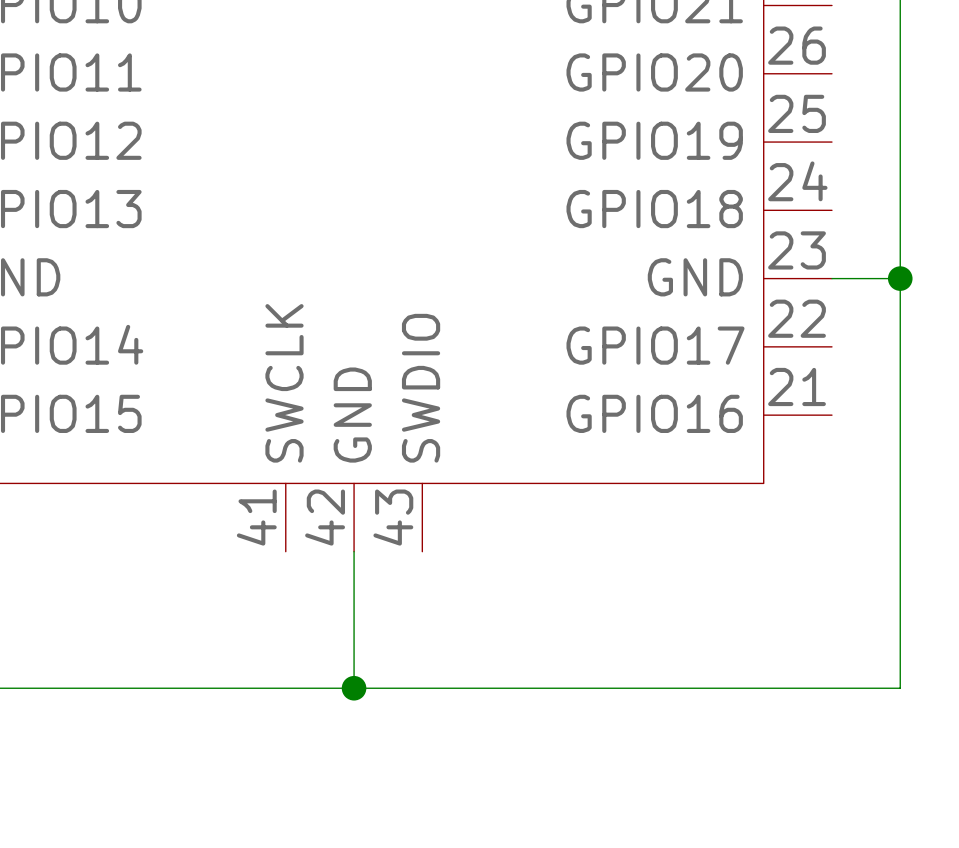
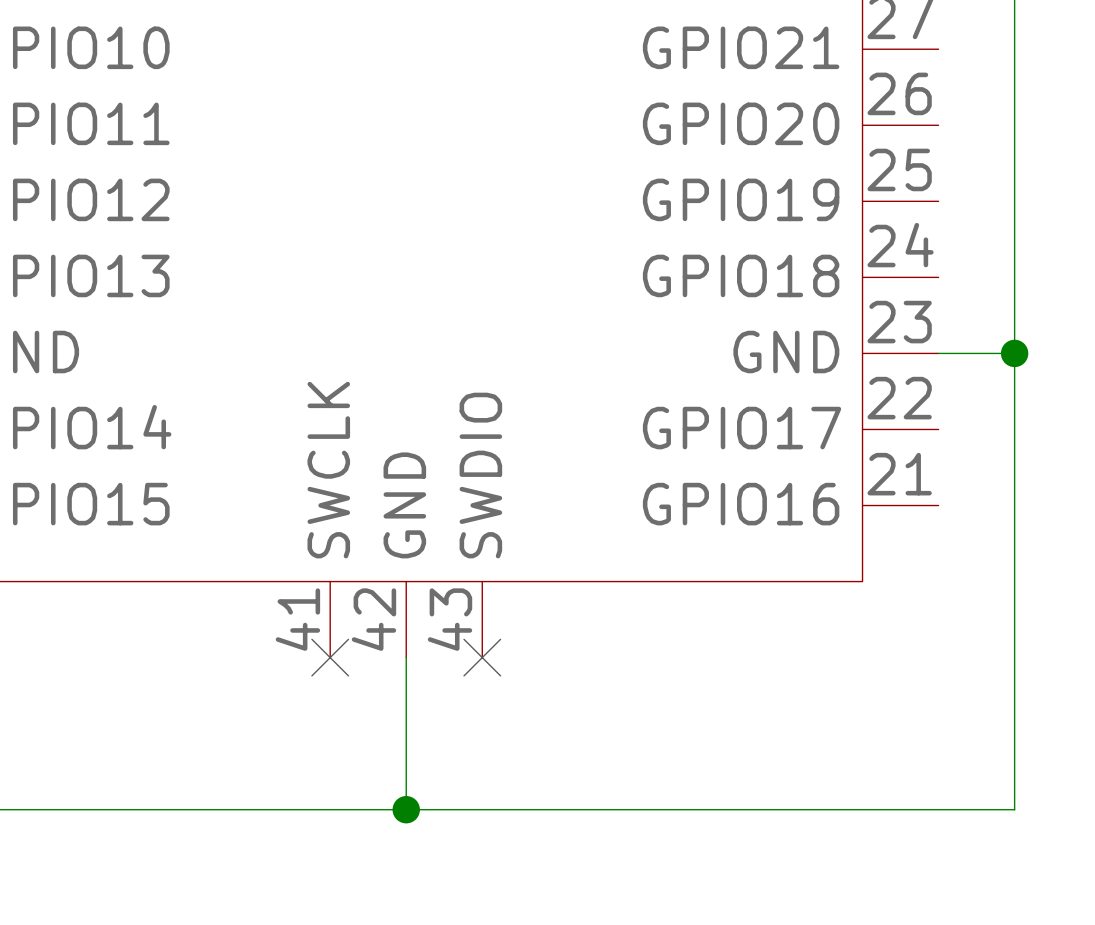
no-connect mark: none -> (330, 657)
no-connect mark: none -> (482, 657)

